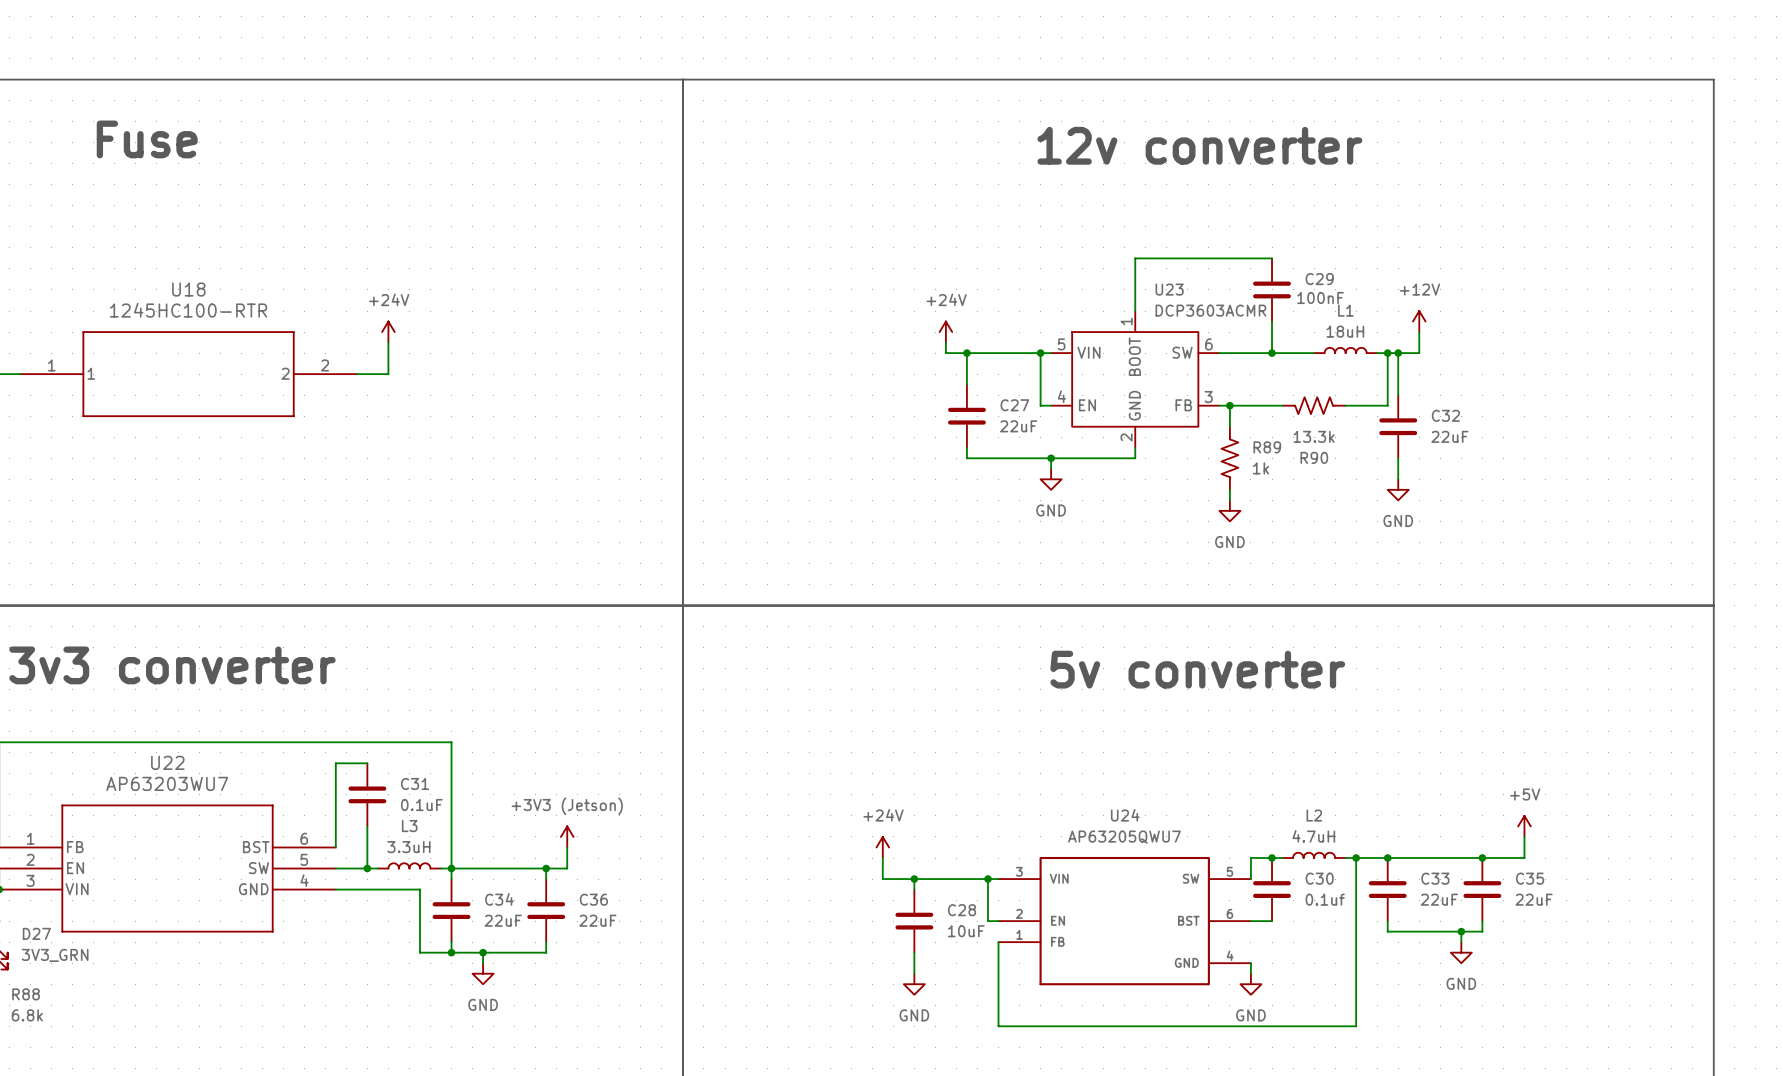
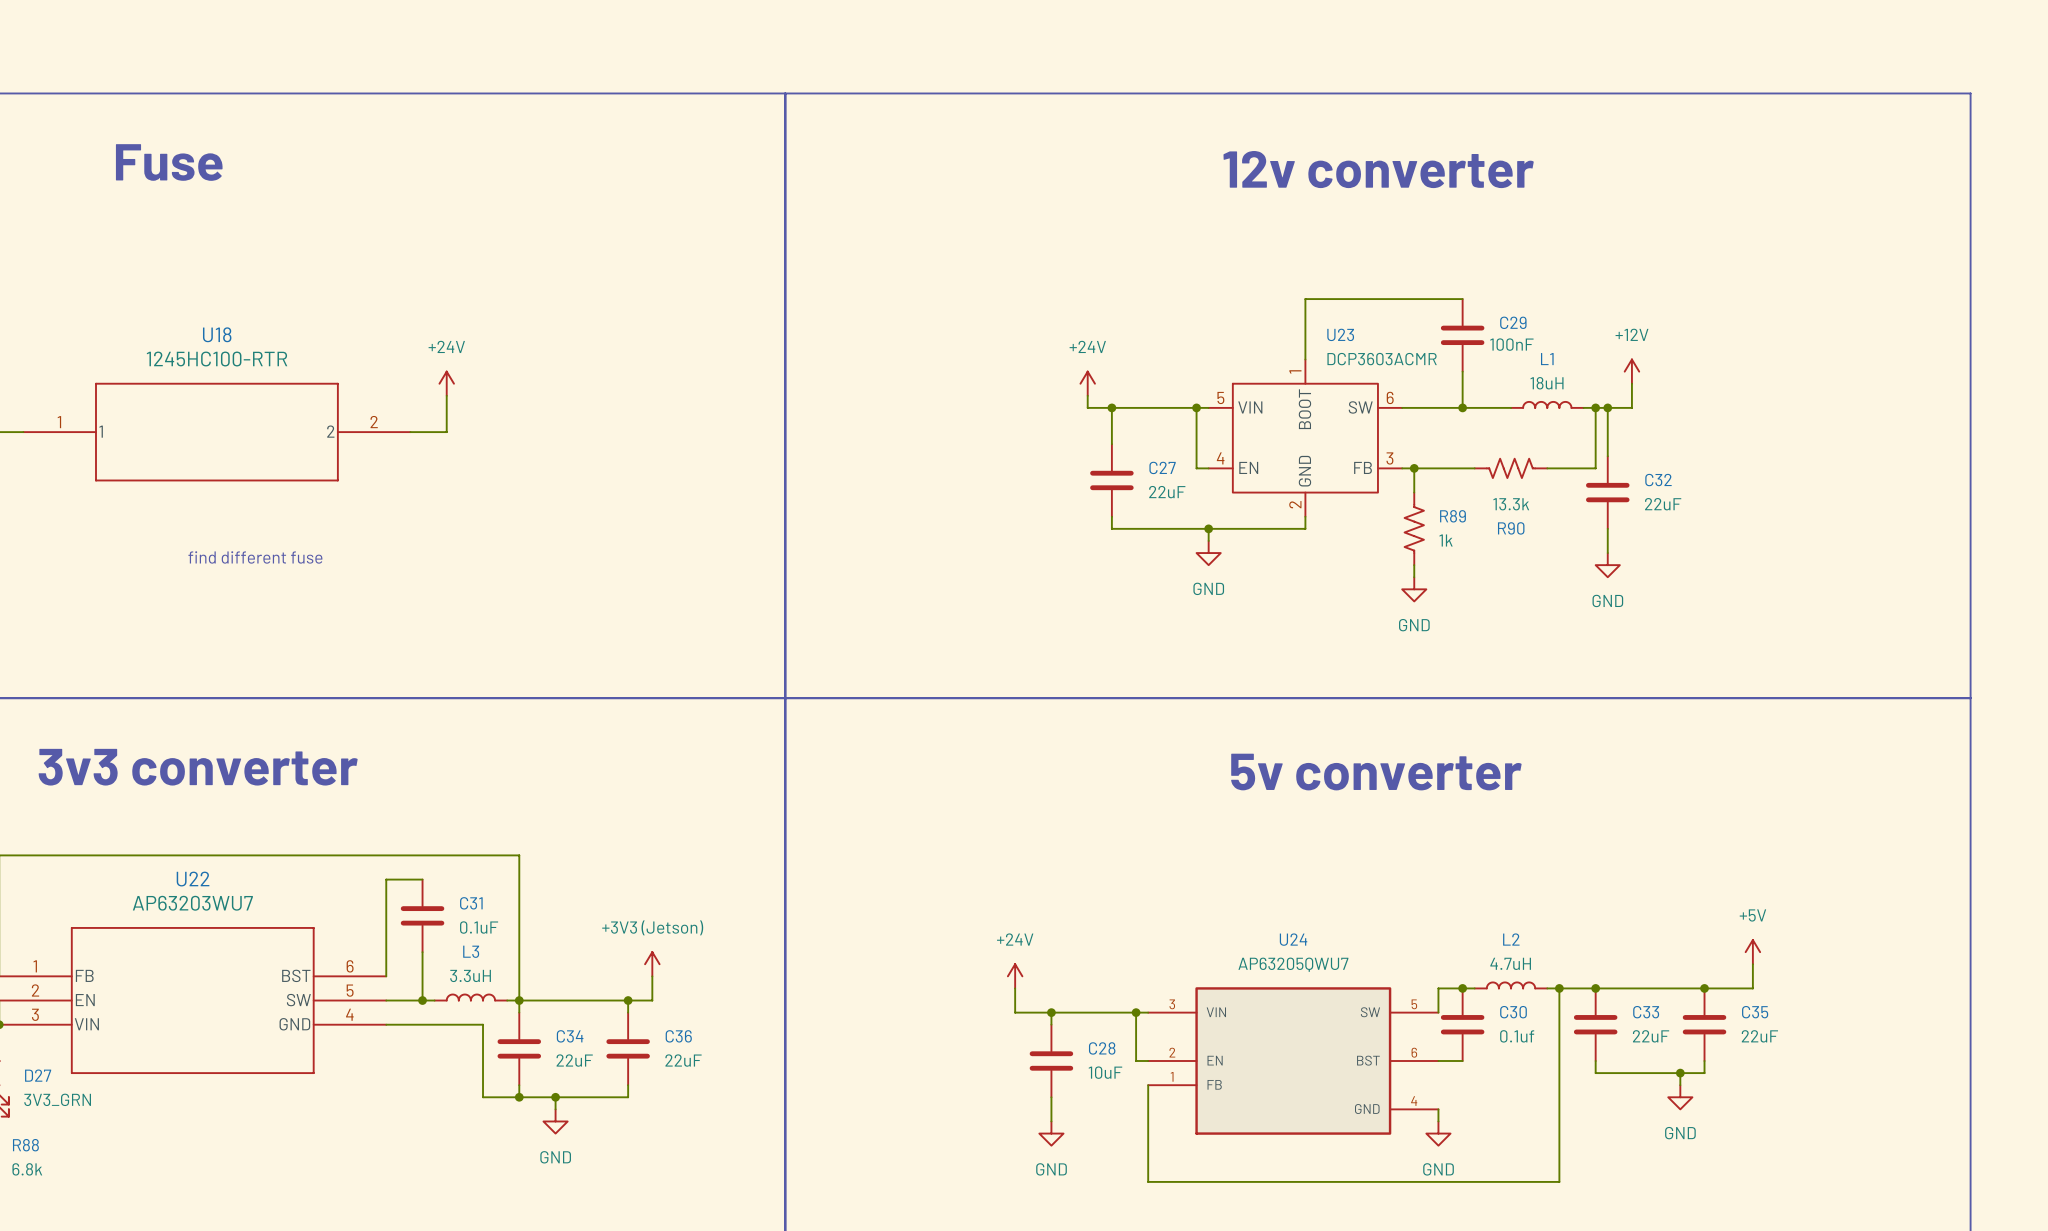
text: none -> find different fuse (255, 557)

